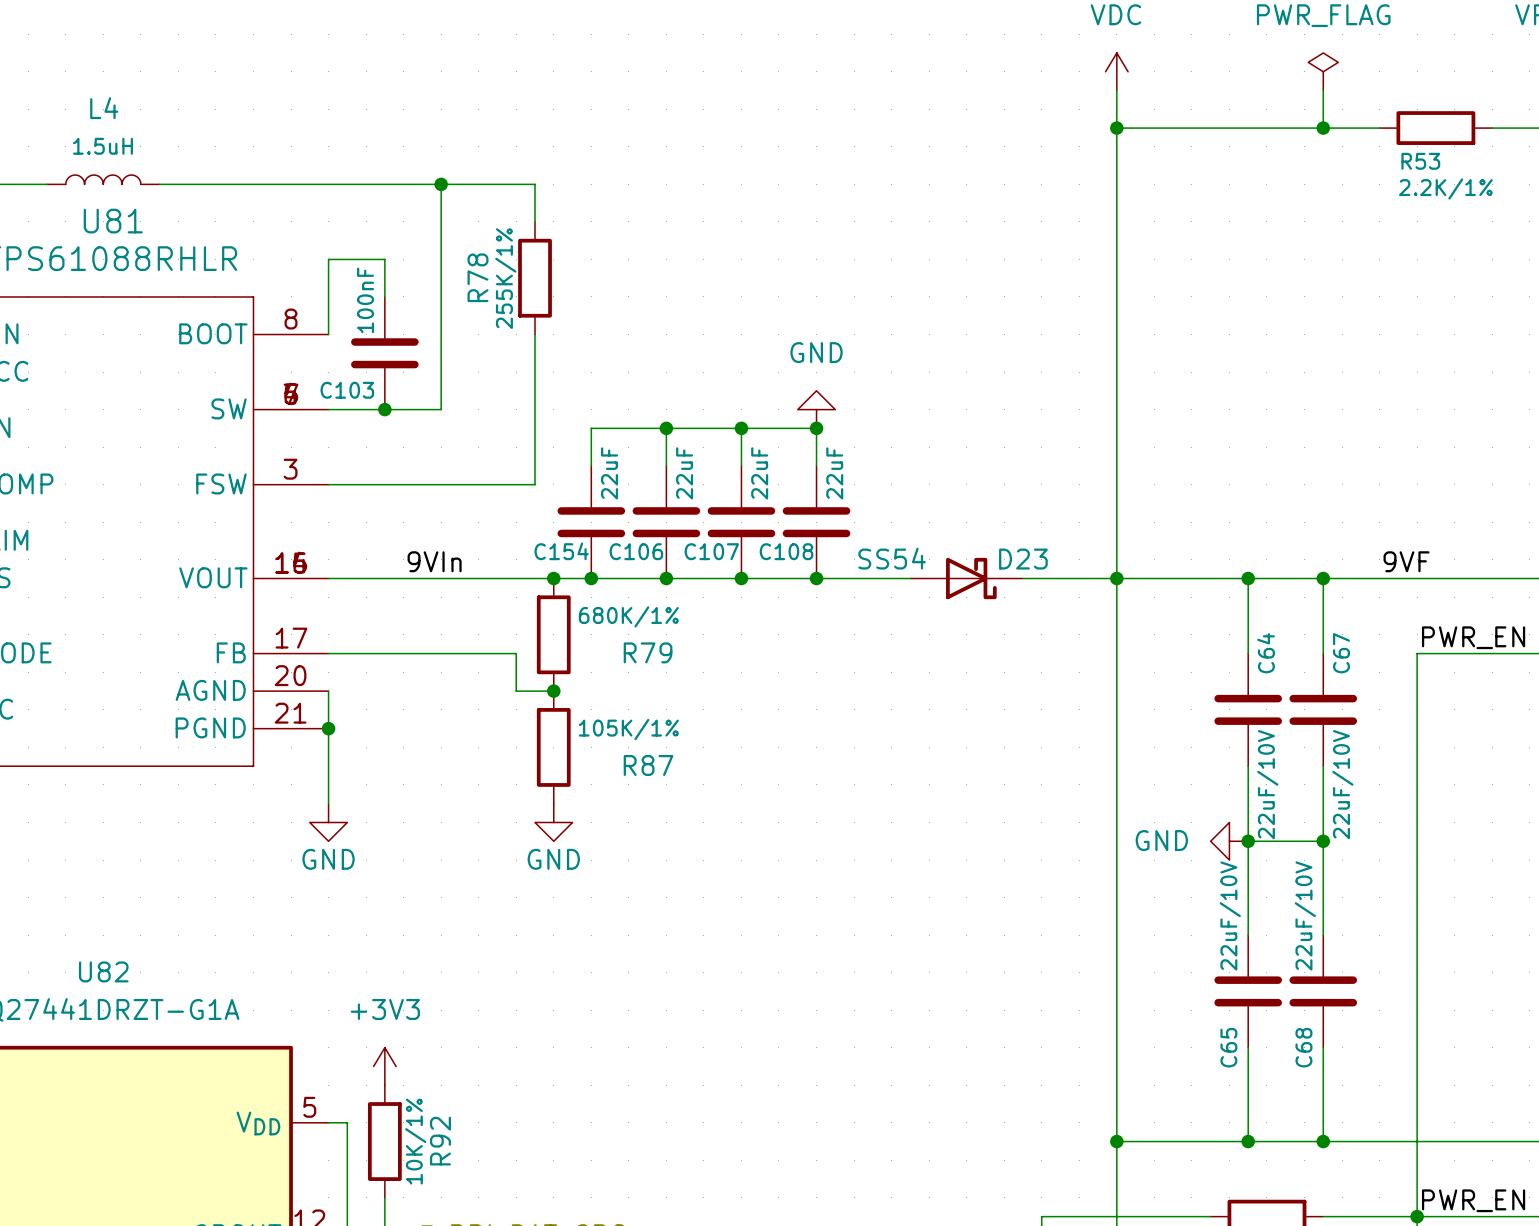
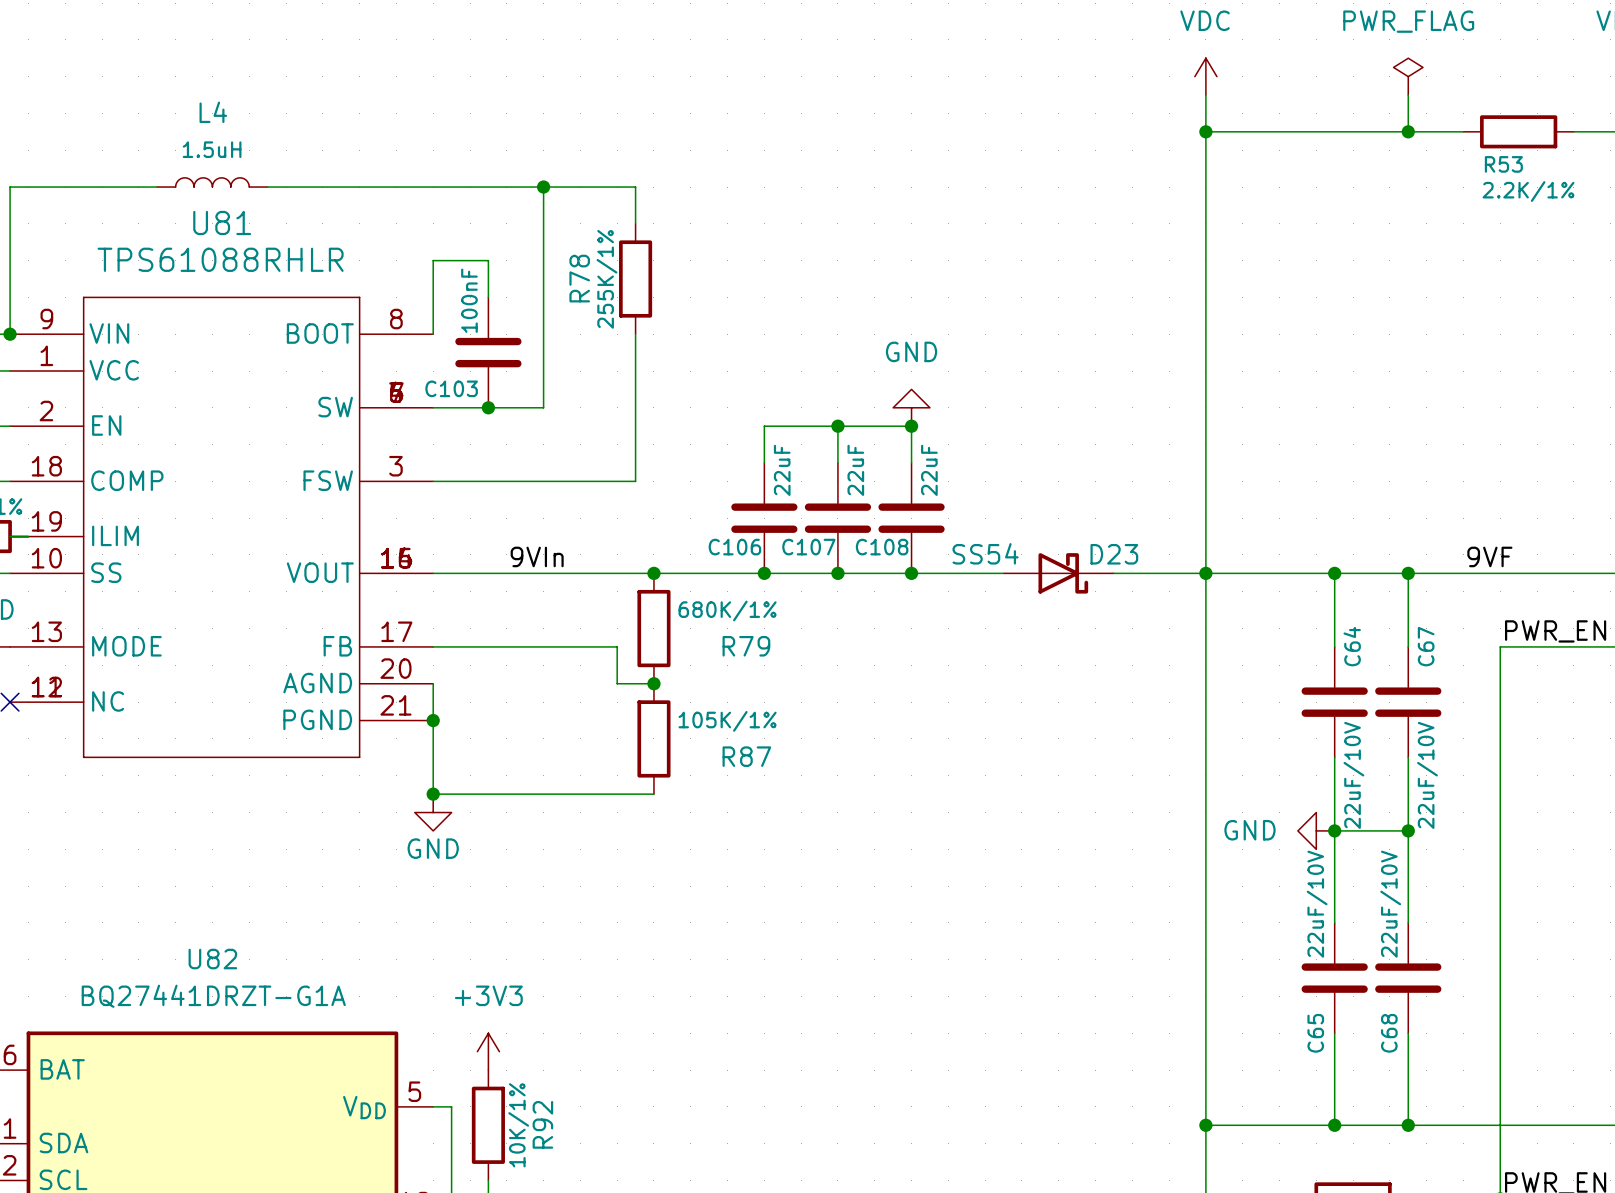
wire: (666, 428) (591, 428) (591, 465) -> none
junction: (666, 428) -> none
C154: 22uF (591, 522) -> none
junction: (591, 578) -> none
wire: none -> (433, 794) (653, 794)
junction: none -> (433, 794)
power symbol: GND (553, 822) -> none

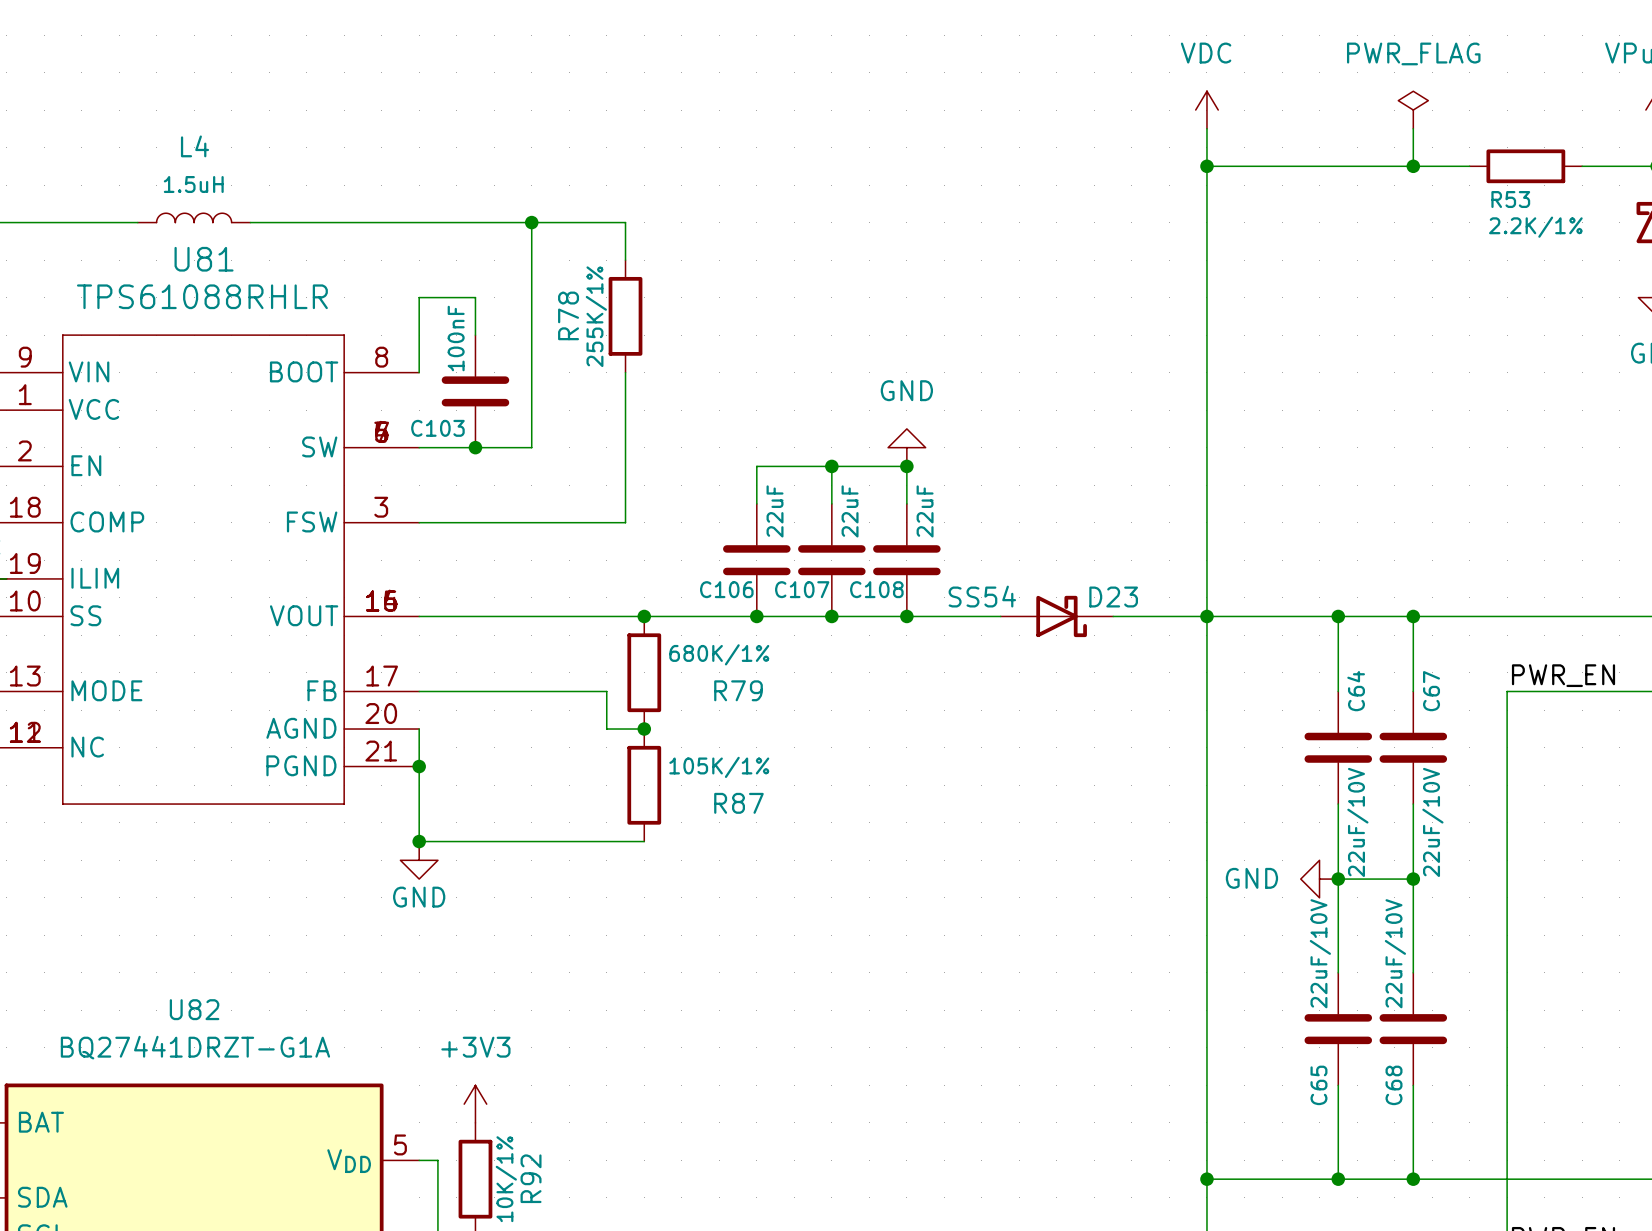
label: 9VIn (537, 556) -> none
label: 9VF (1489, 556) -> none

